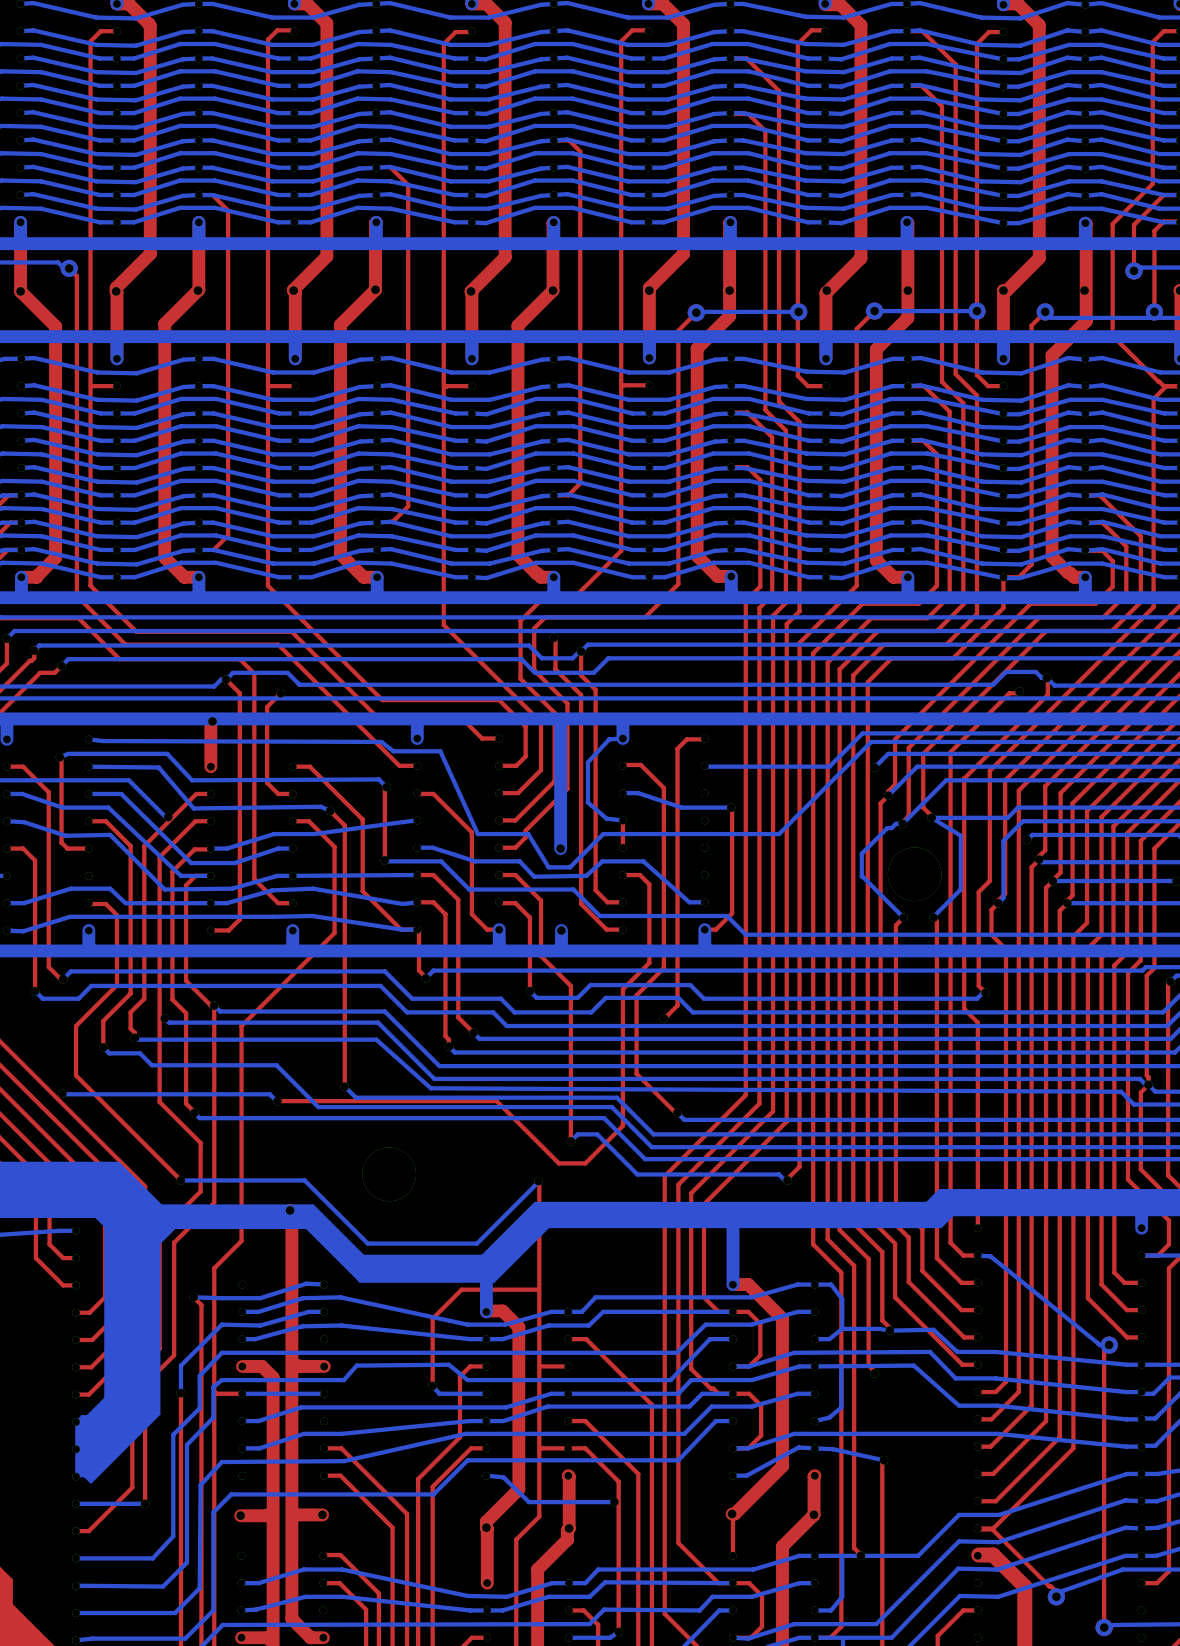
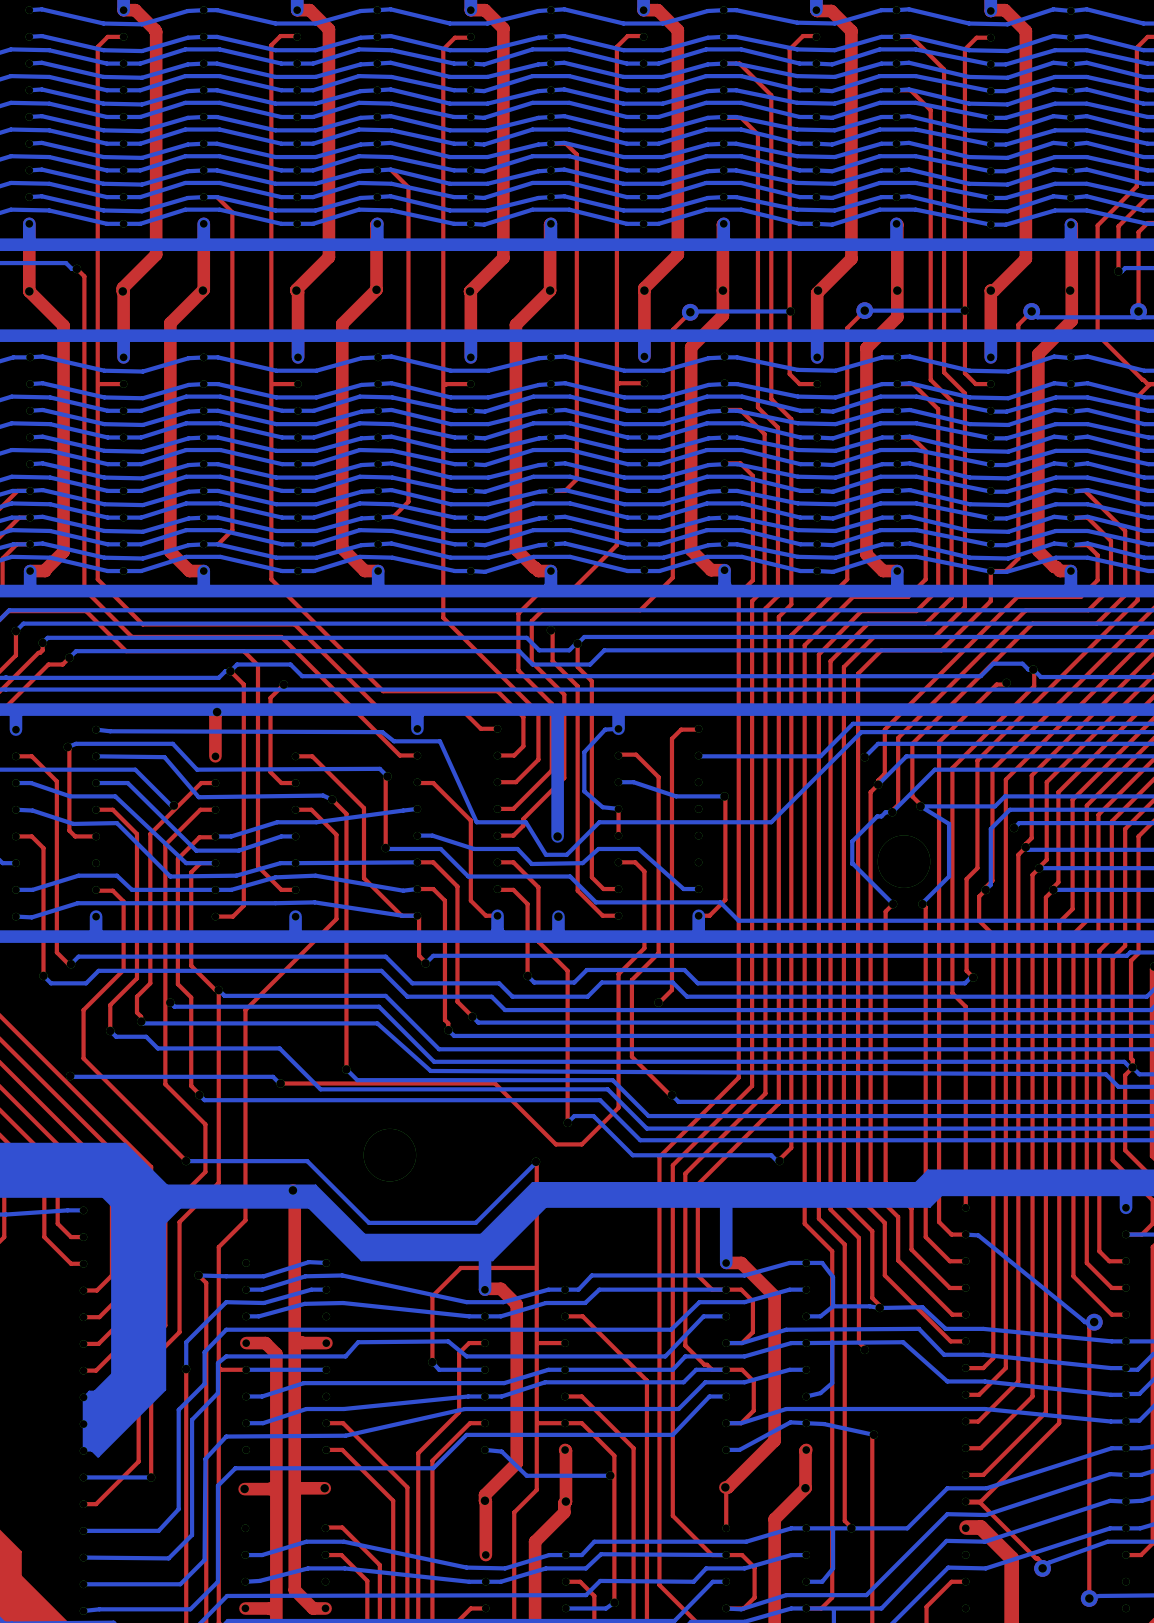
drawing: [60, 259, 78, 278] -> none
drawing: [1125, 262, 1143, 280] -> none
drawing: [968, 302, 986, 320] -> none
drawing: [790, 303, 808, 321] -> none

